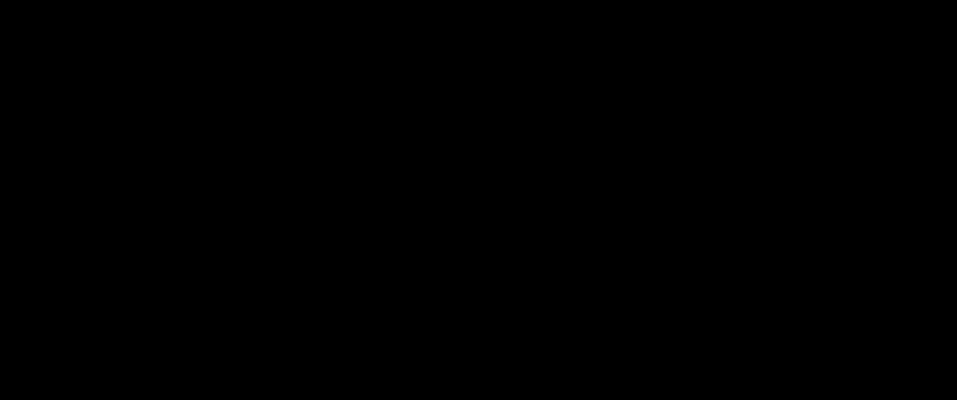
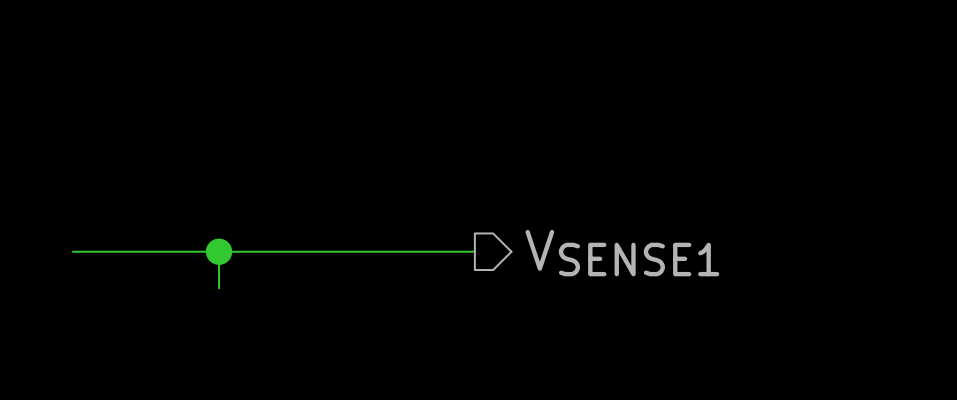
wire: none -> (72, 251) (474, 251)
wire: none -> (219, 251) (219, 288)
junction: none -> (219, 251)
hierarchical label: none -> VSENSE1 (622, 253)

